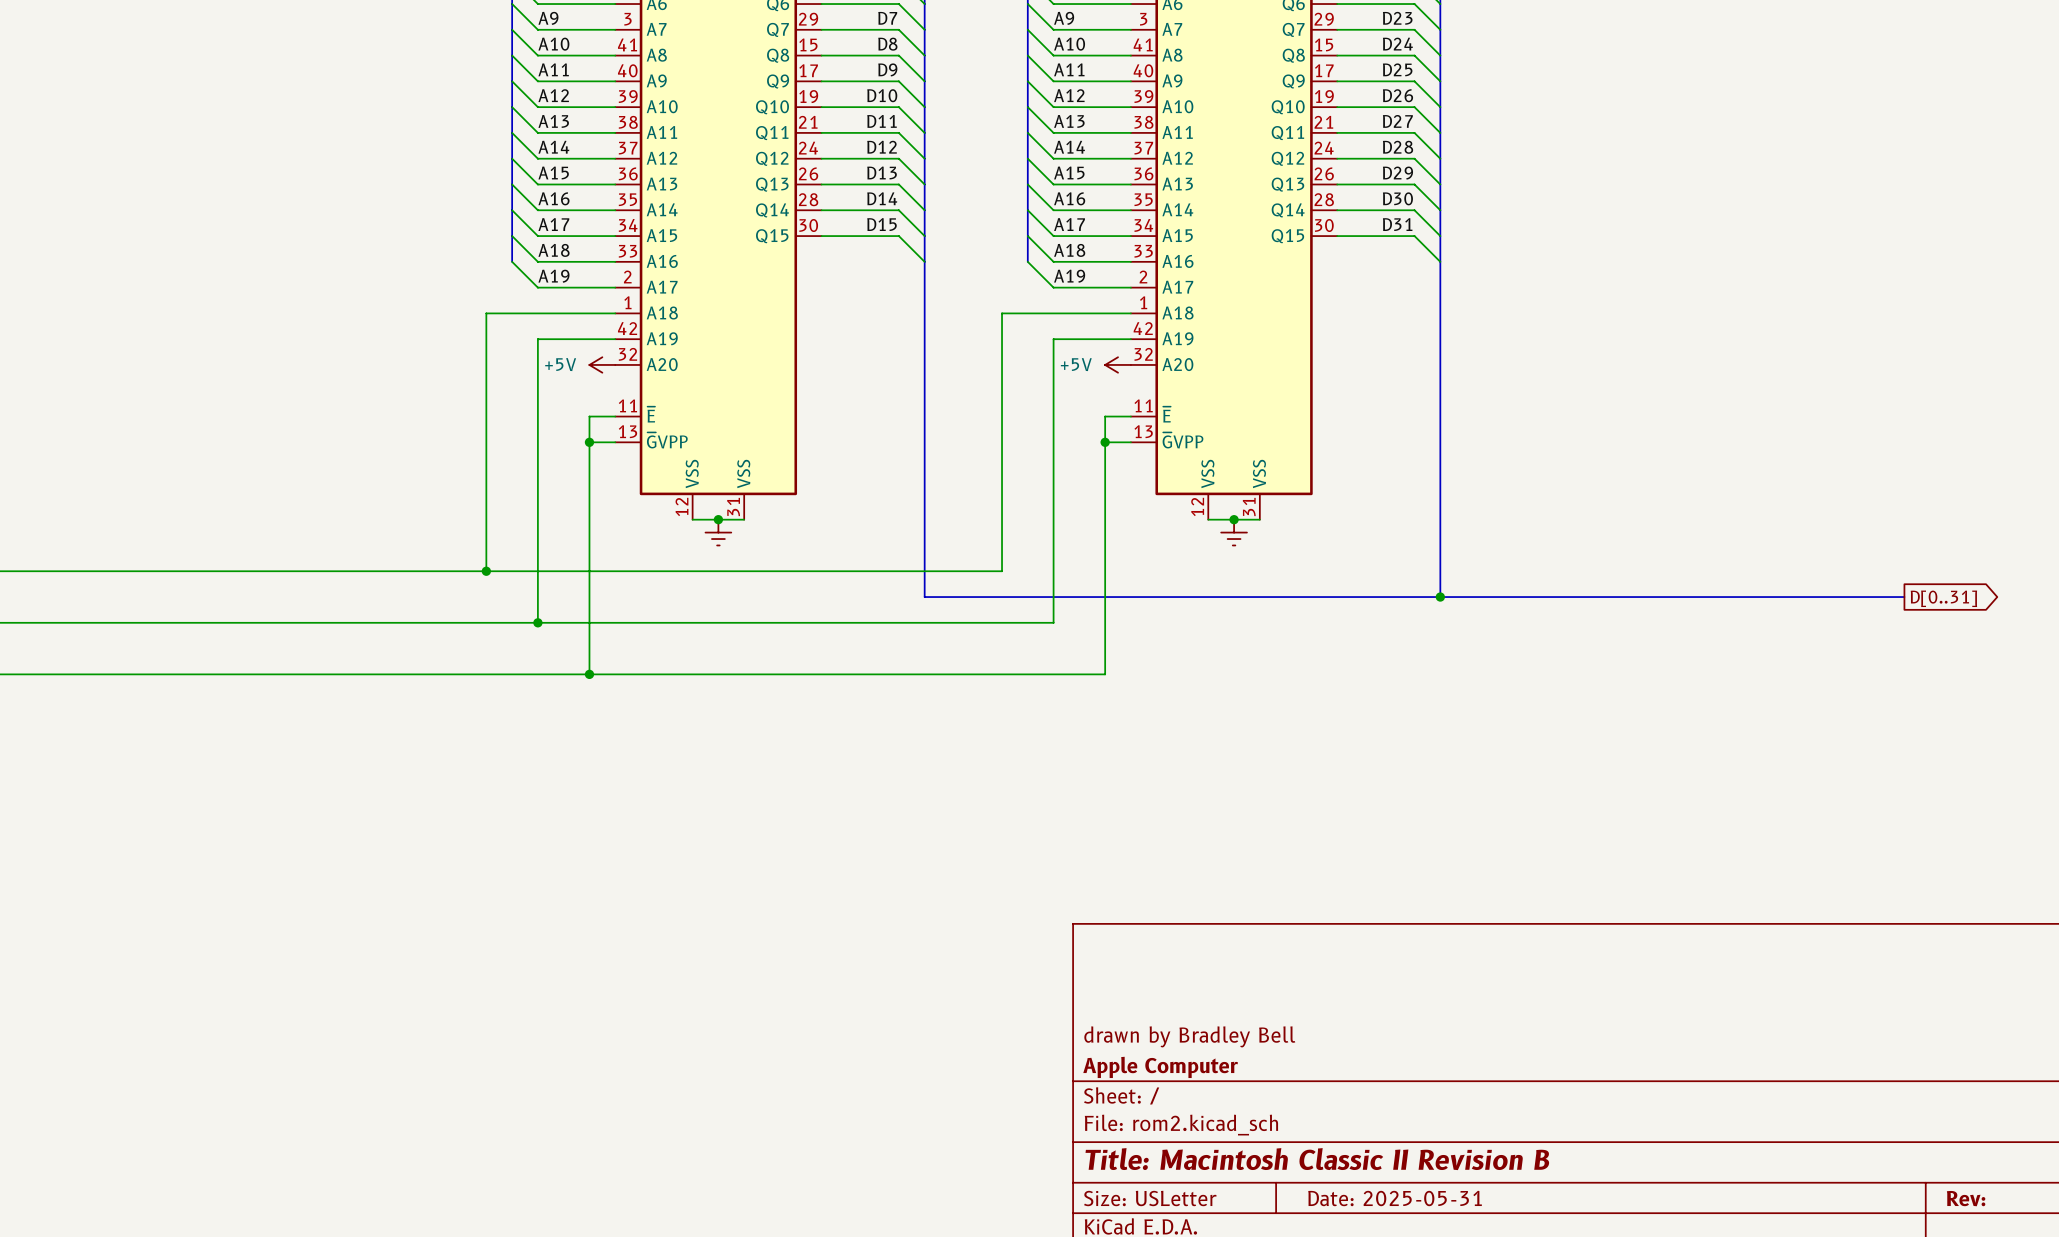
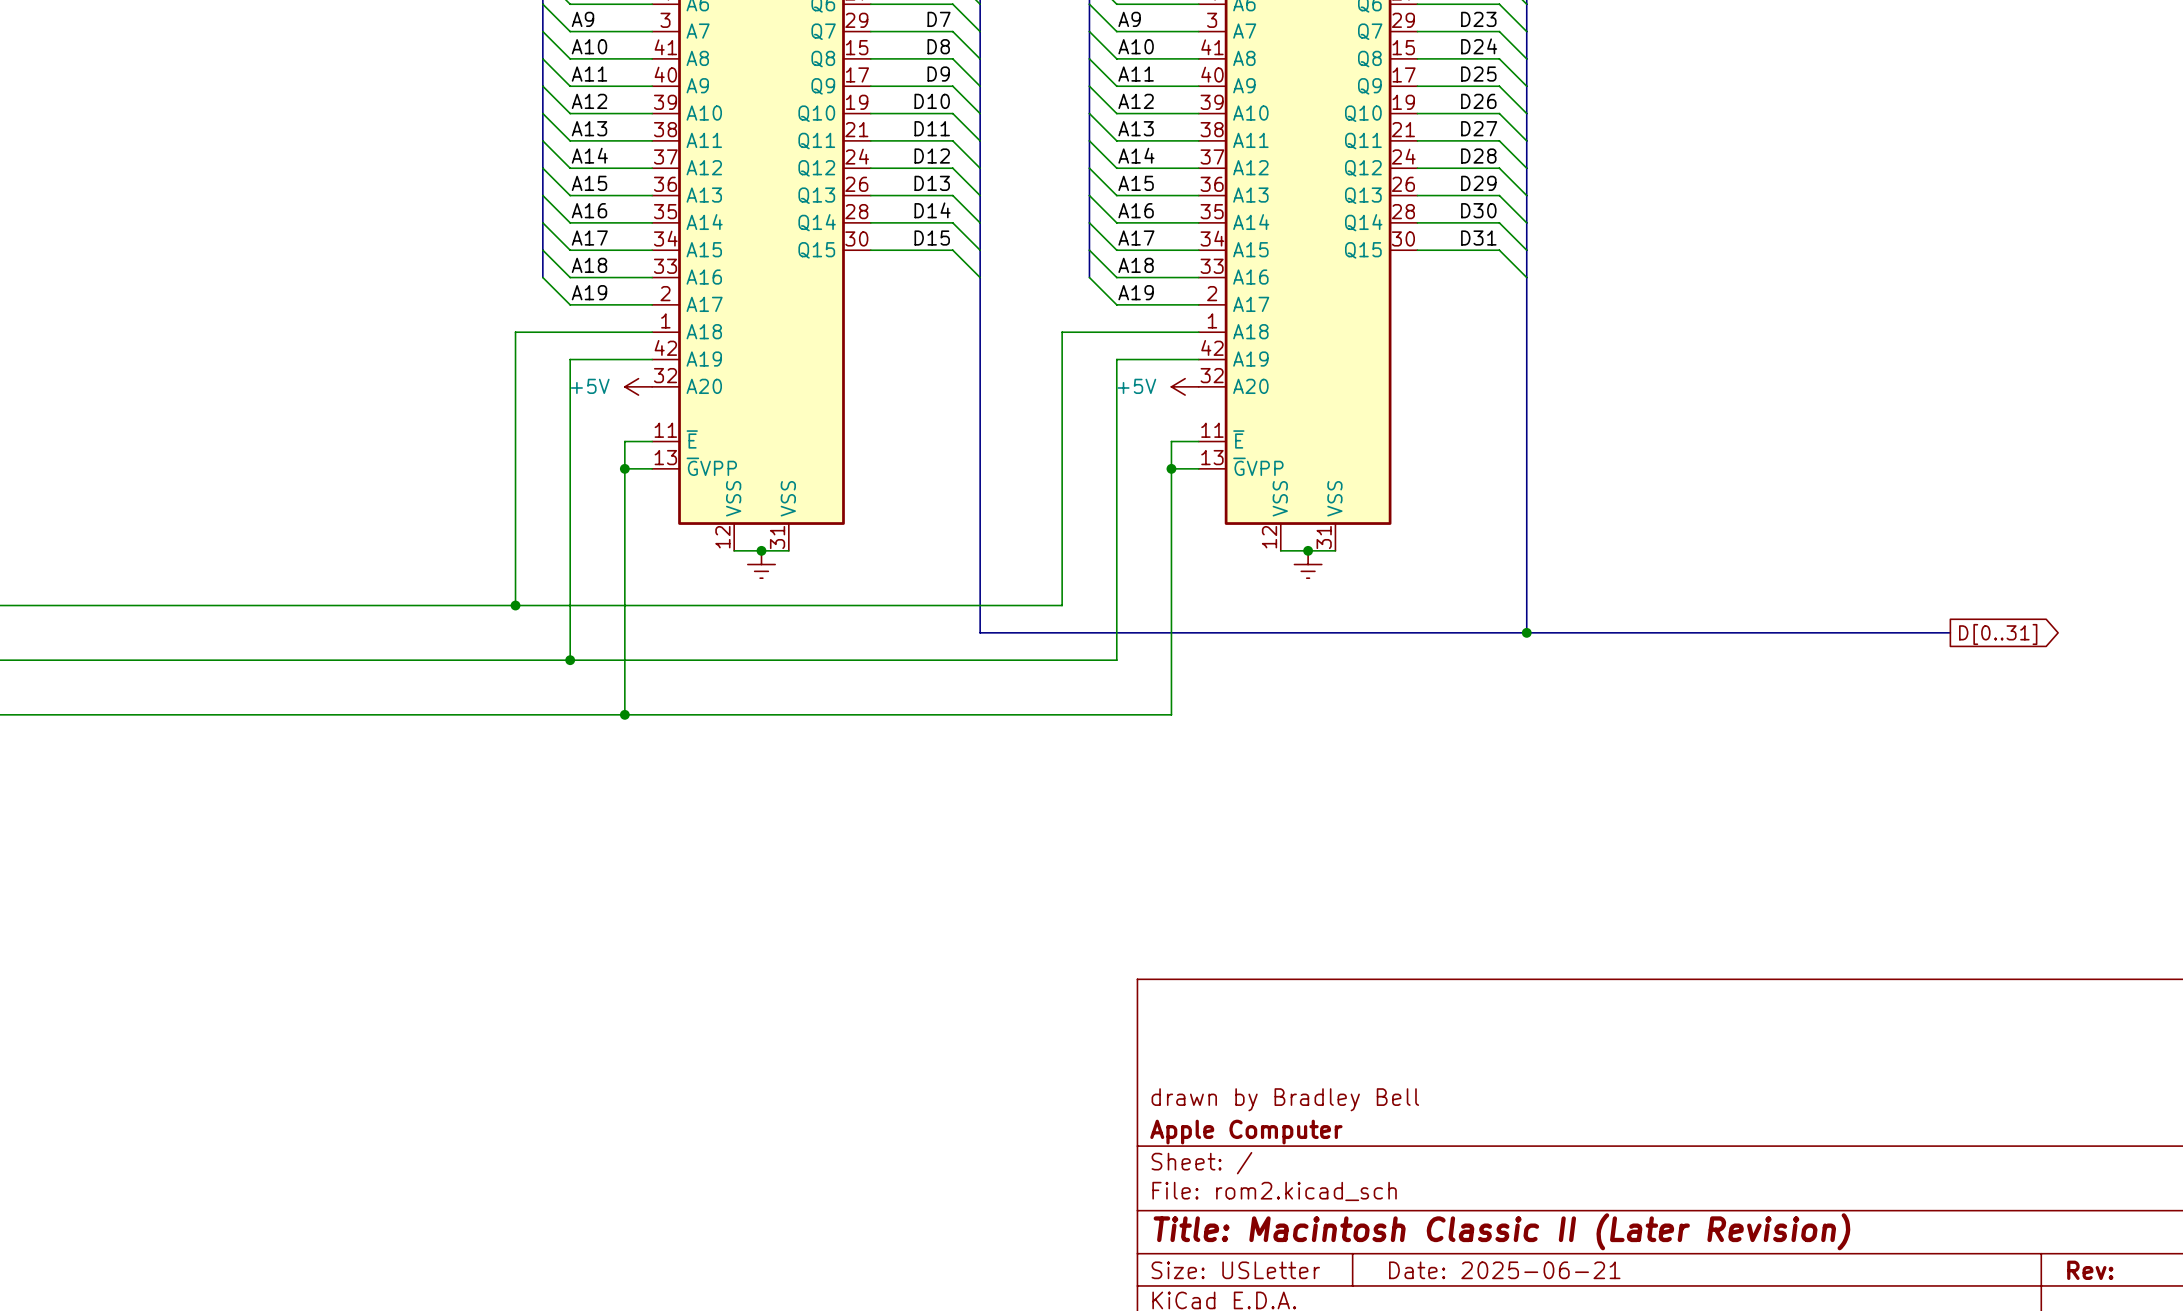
bus: (1839, 597) (1904, 597) -> none
global label position: D[0..31] (1943, 598) -> D[0..31] (1998, 634)
title block: Title: Macintosh Classic II Revision B (1317, 1159) -> Title: Macintosh Classic II (Later Revision) (1501, 1231)
title block: Date: 2025-05-31 (1395, 1198) -> Date: 2025-06-21 (1504, 1270)

